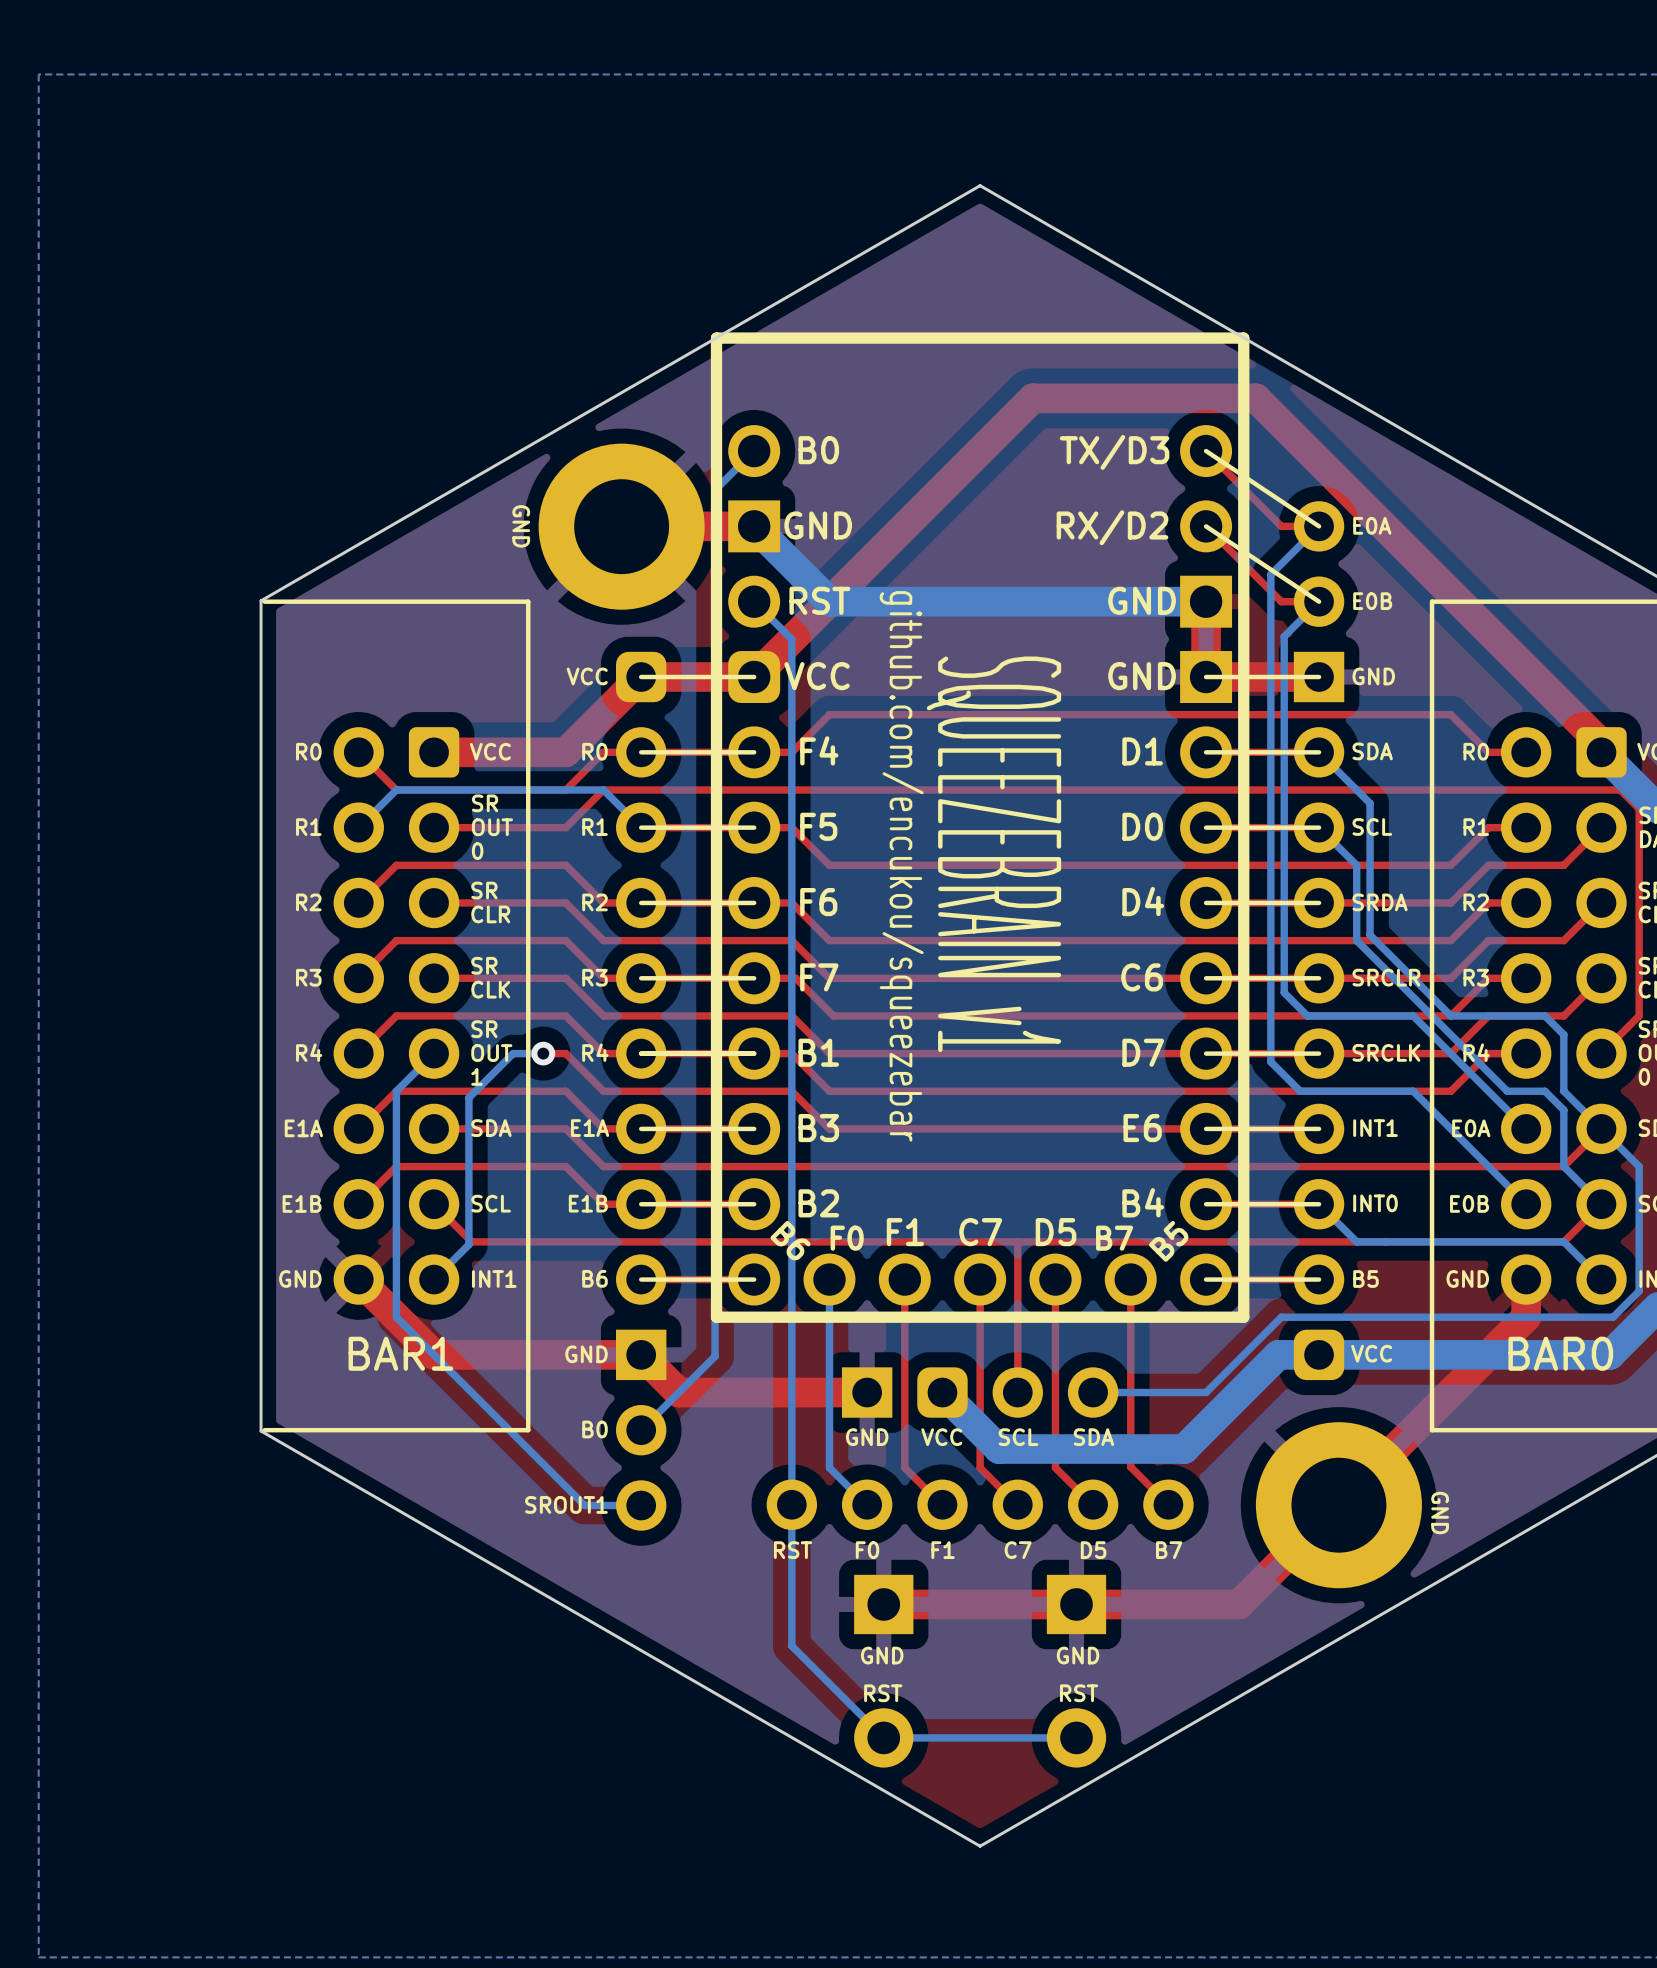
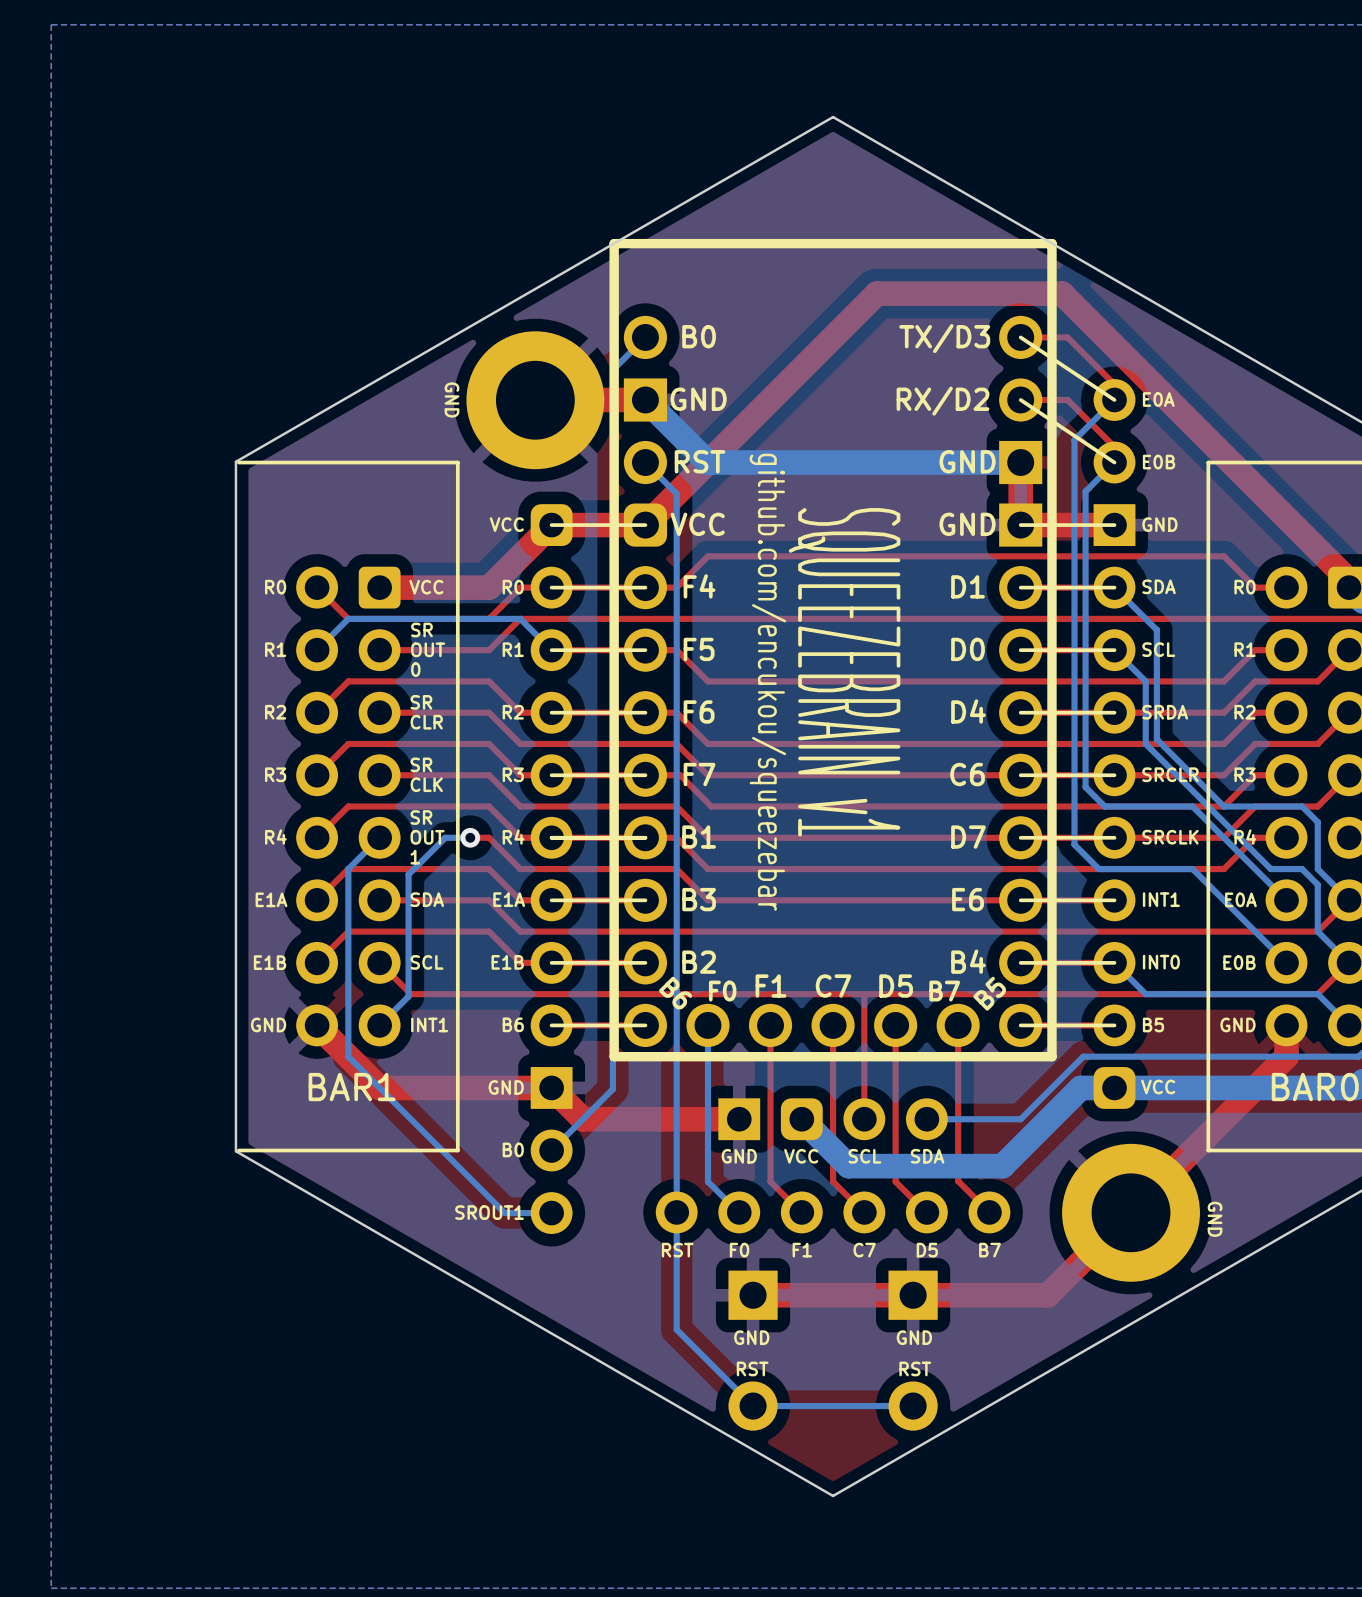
top track: (1206, 451) (1281, 526) (1319, 526) -> (1020, 337) (1067, 337) (1114, 384) (1114, 399)
top track: (1206, 526) (1281, 601) (1319, 601) -> (1020, 399) (1067, 399) (1114, 446) (1114, 462)

